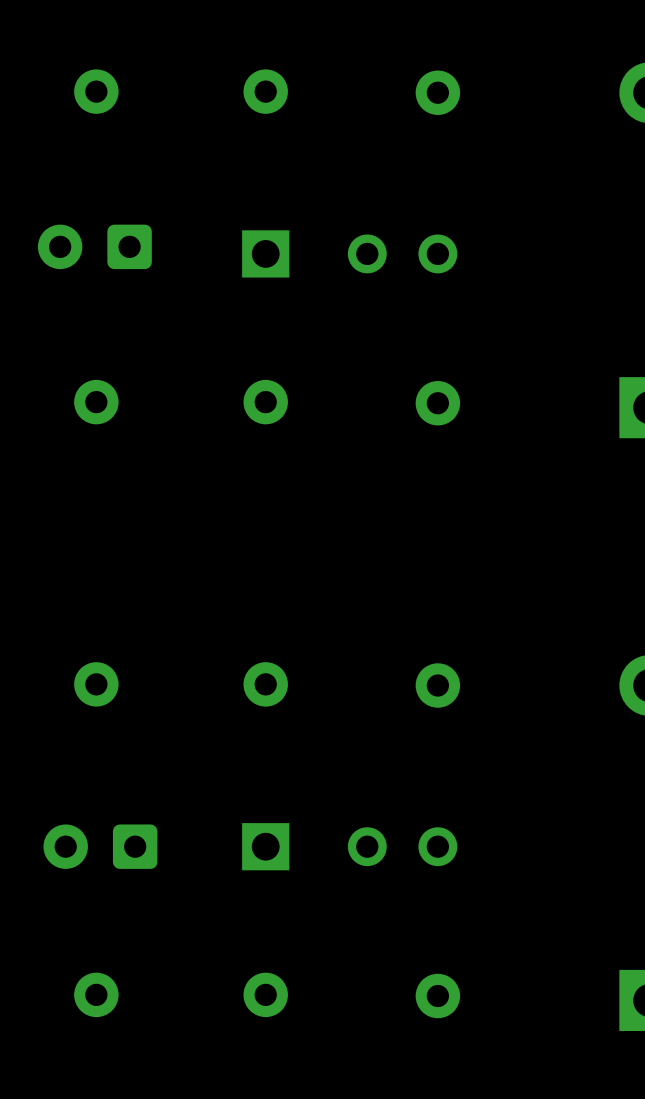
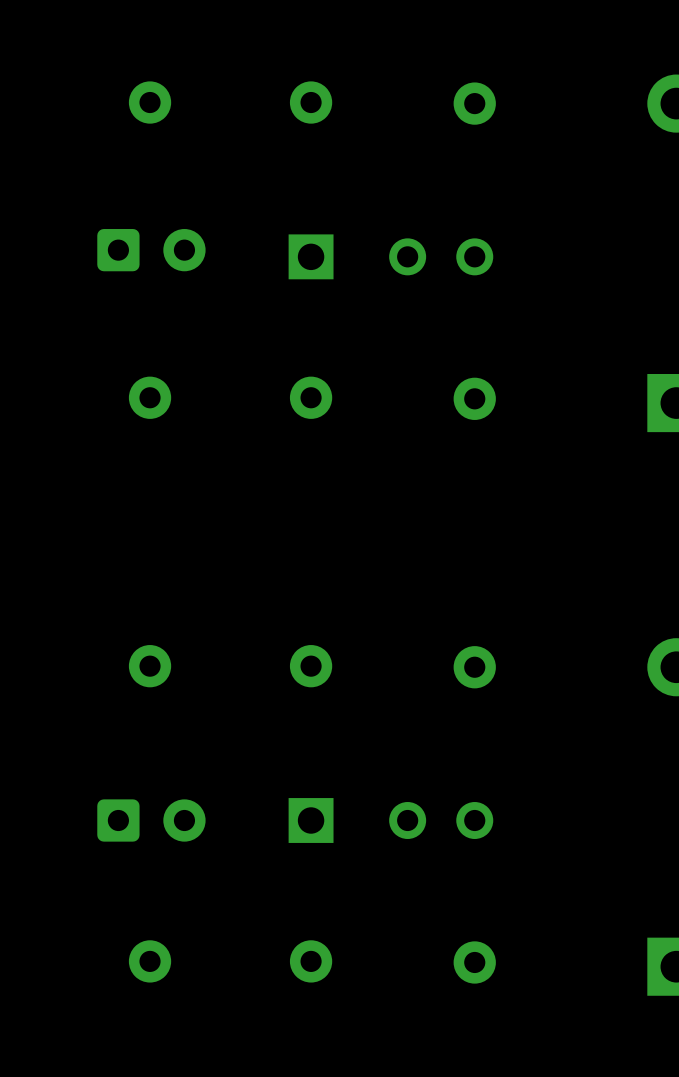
part rotation: 0° (94, 246) -> 180° (151, 250)
part rotation: 0° (100, 846) -> 180° (151, 820)

